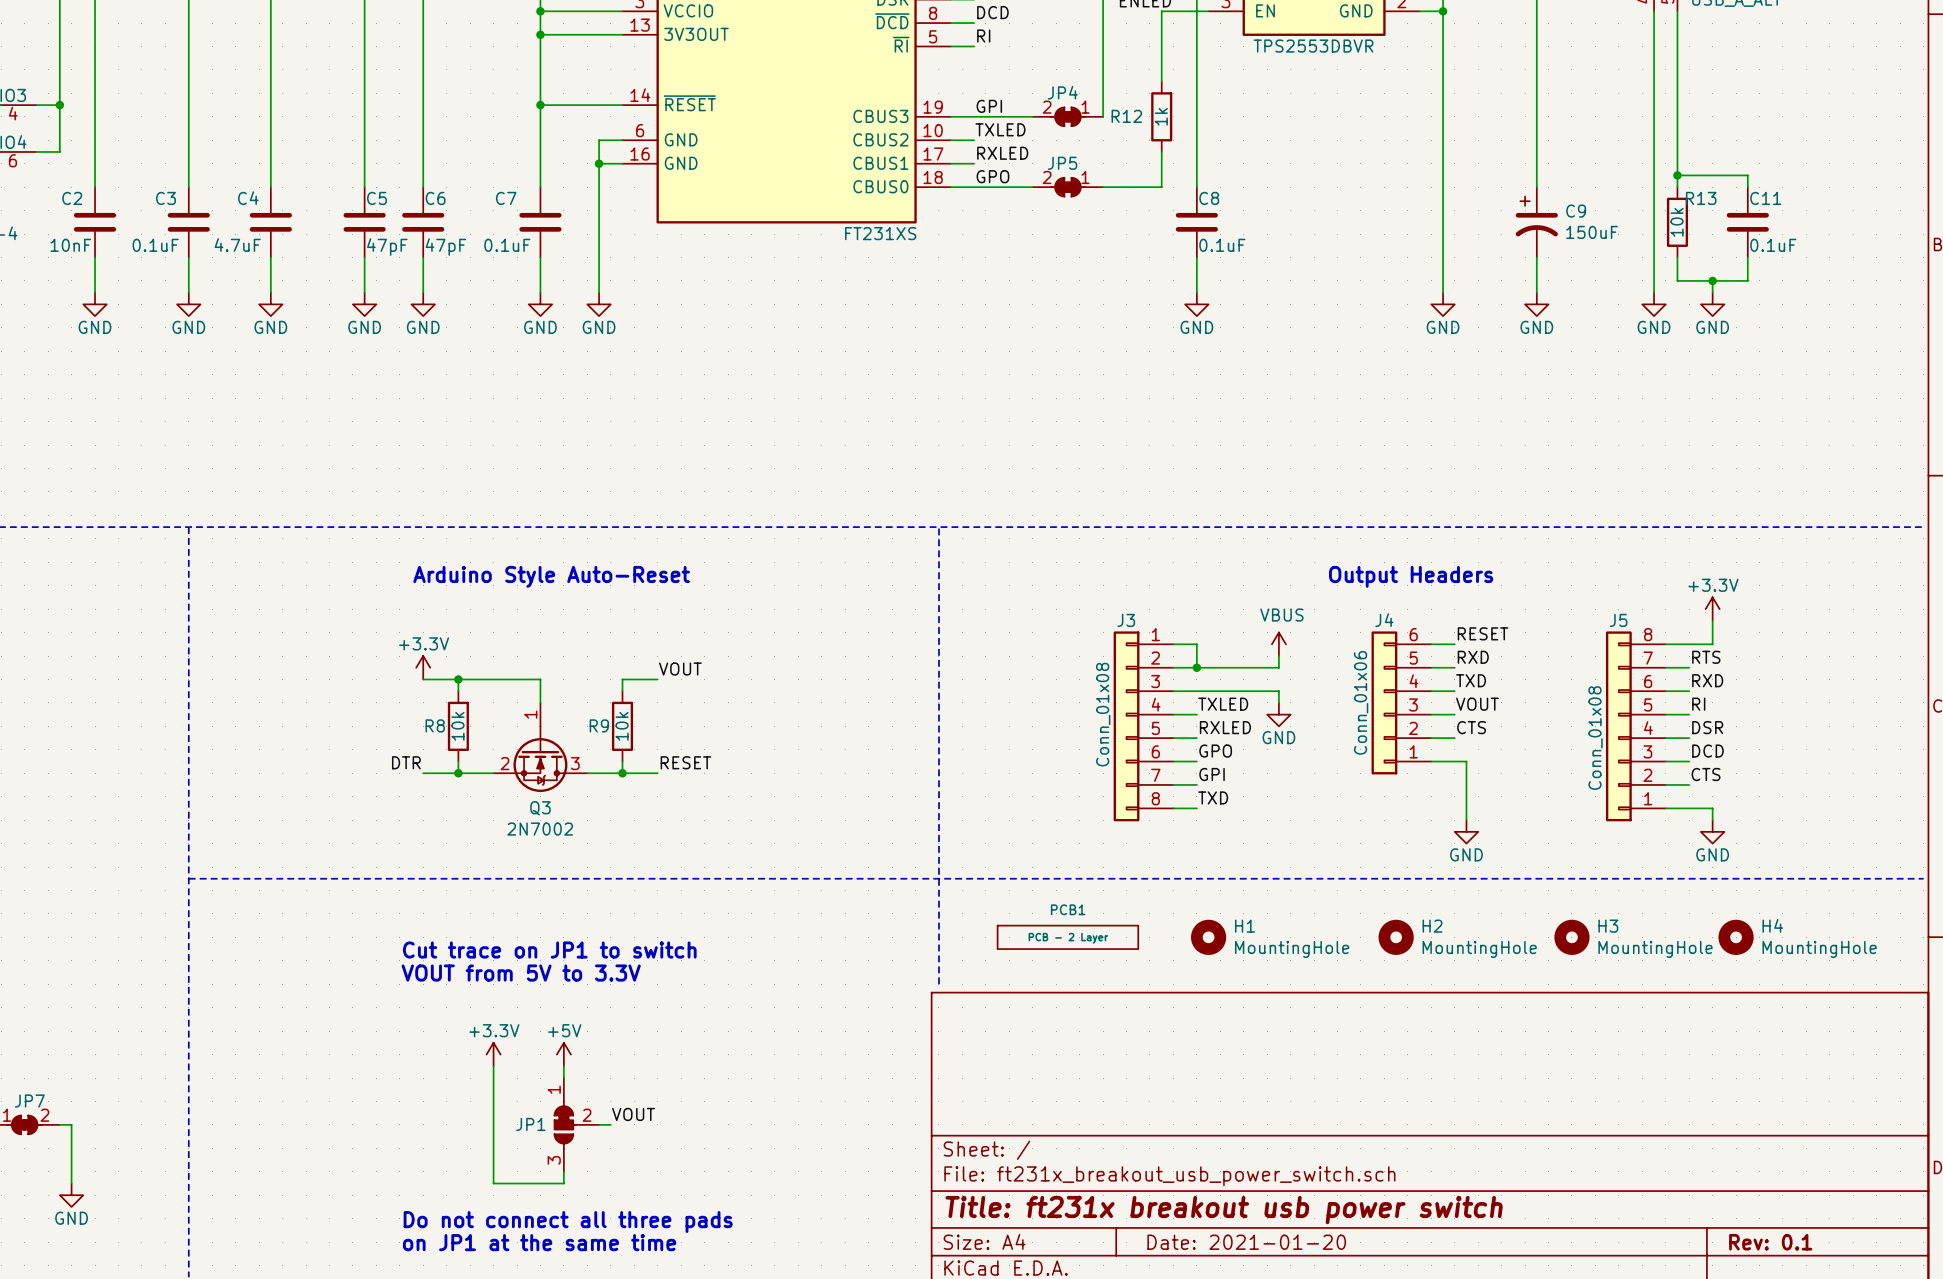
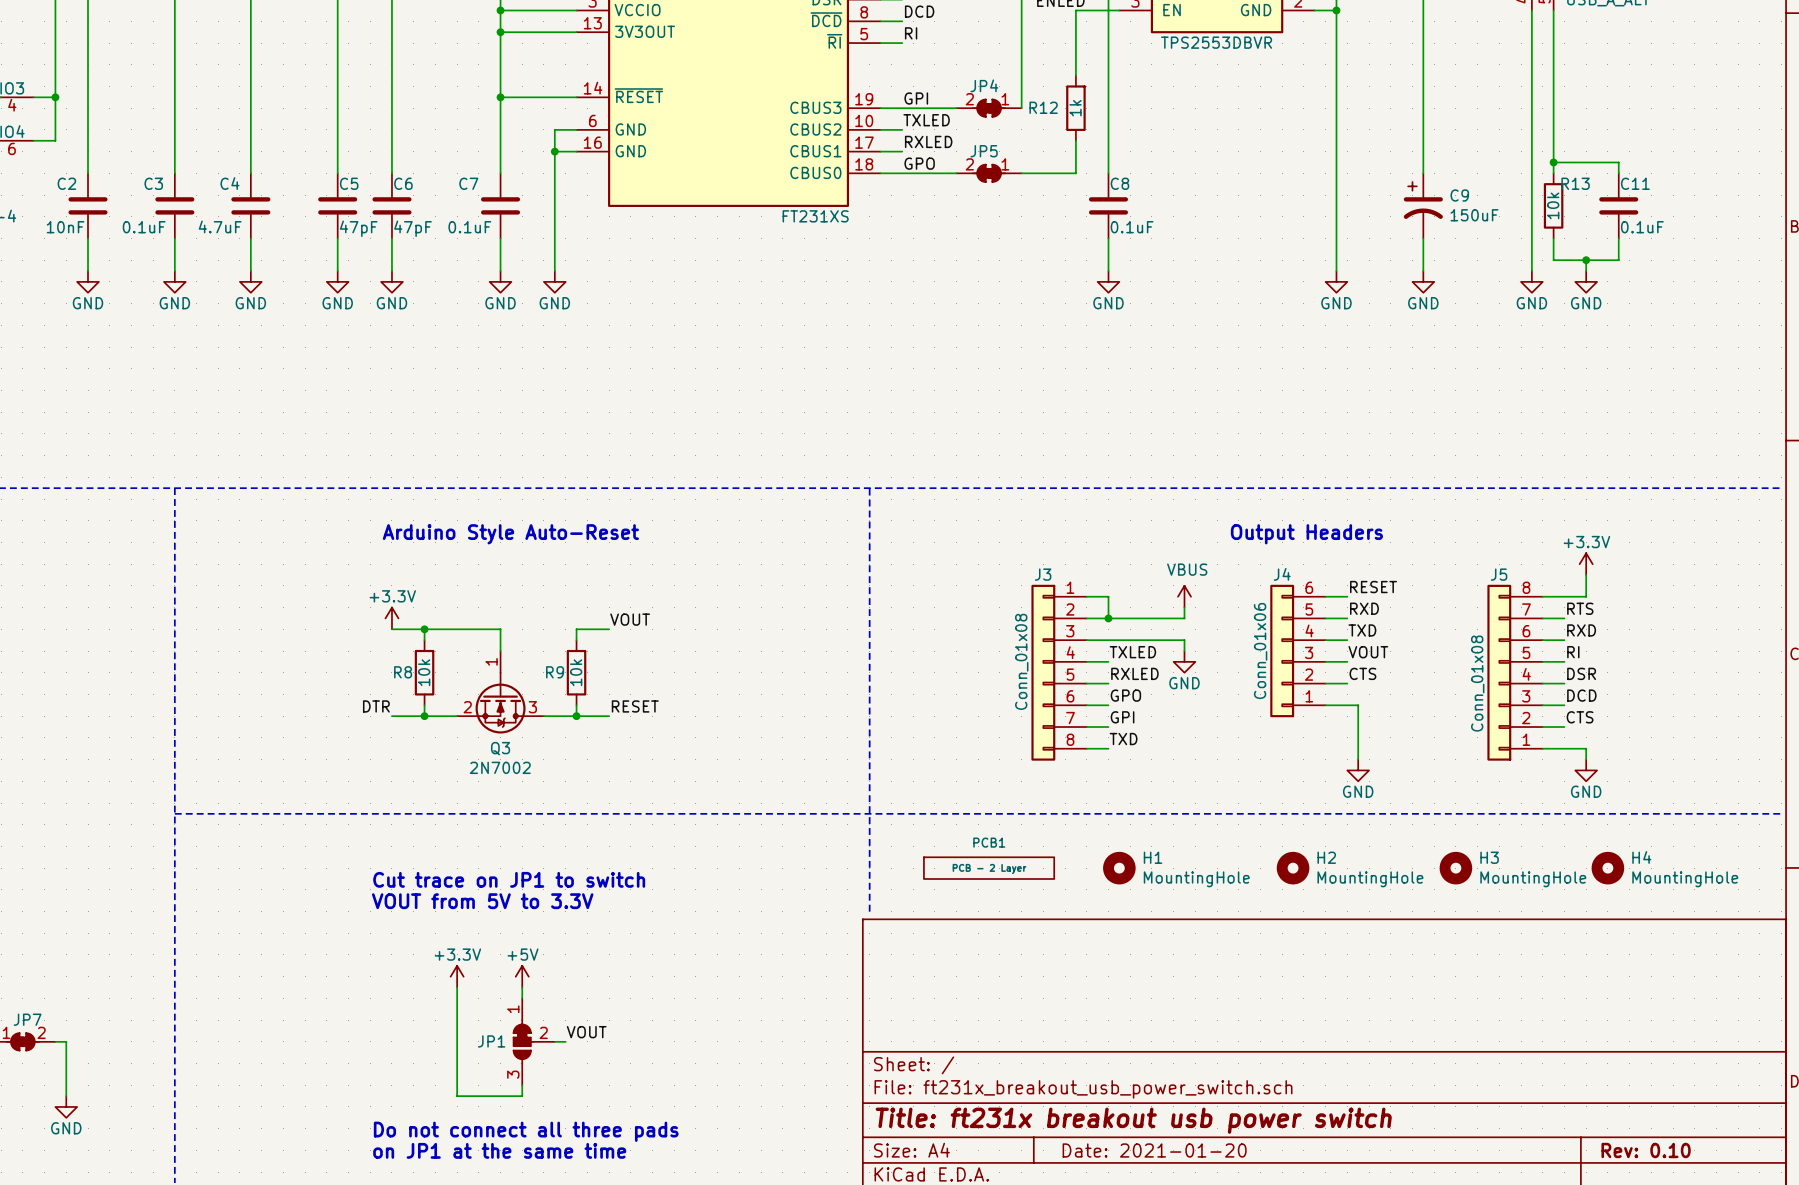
title block: Rev: 0.1 (1770, 1242) -> Rev: 0.10 (1646, 1150)

